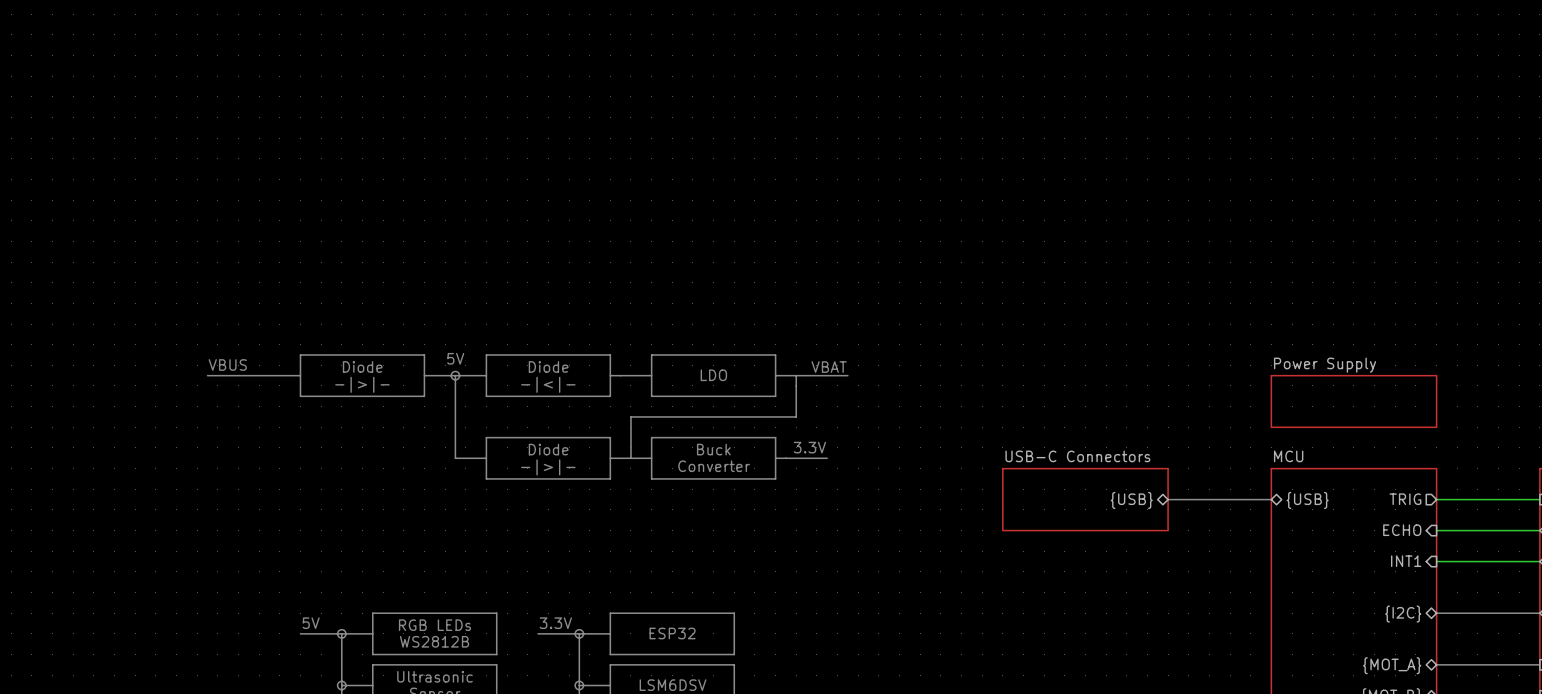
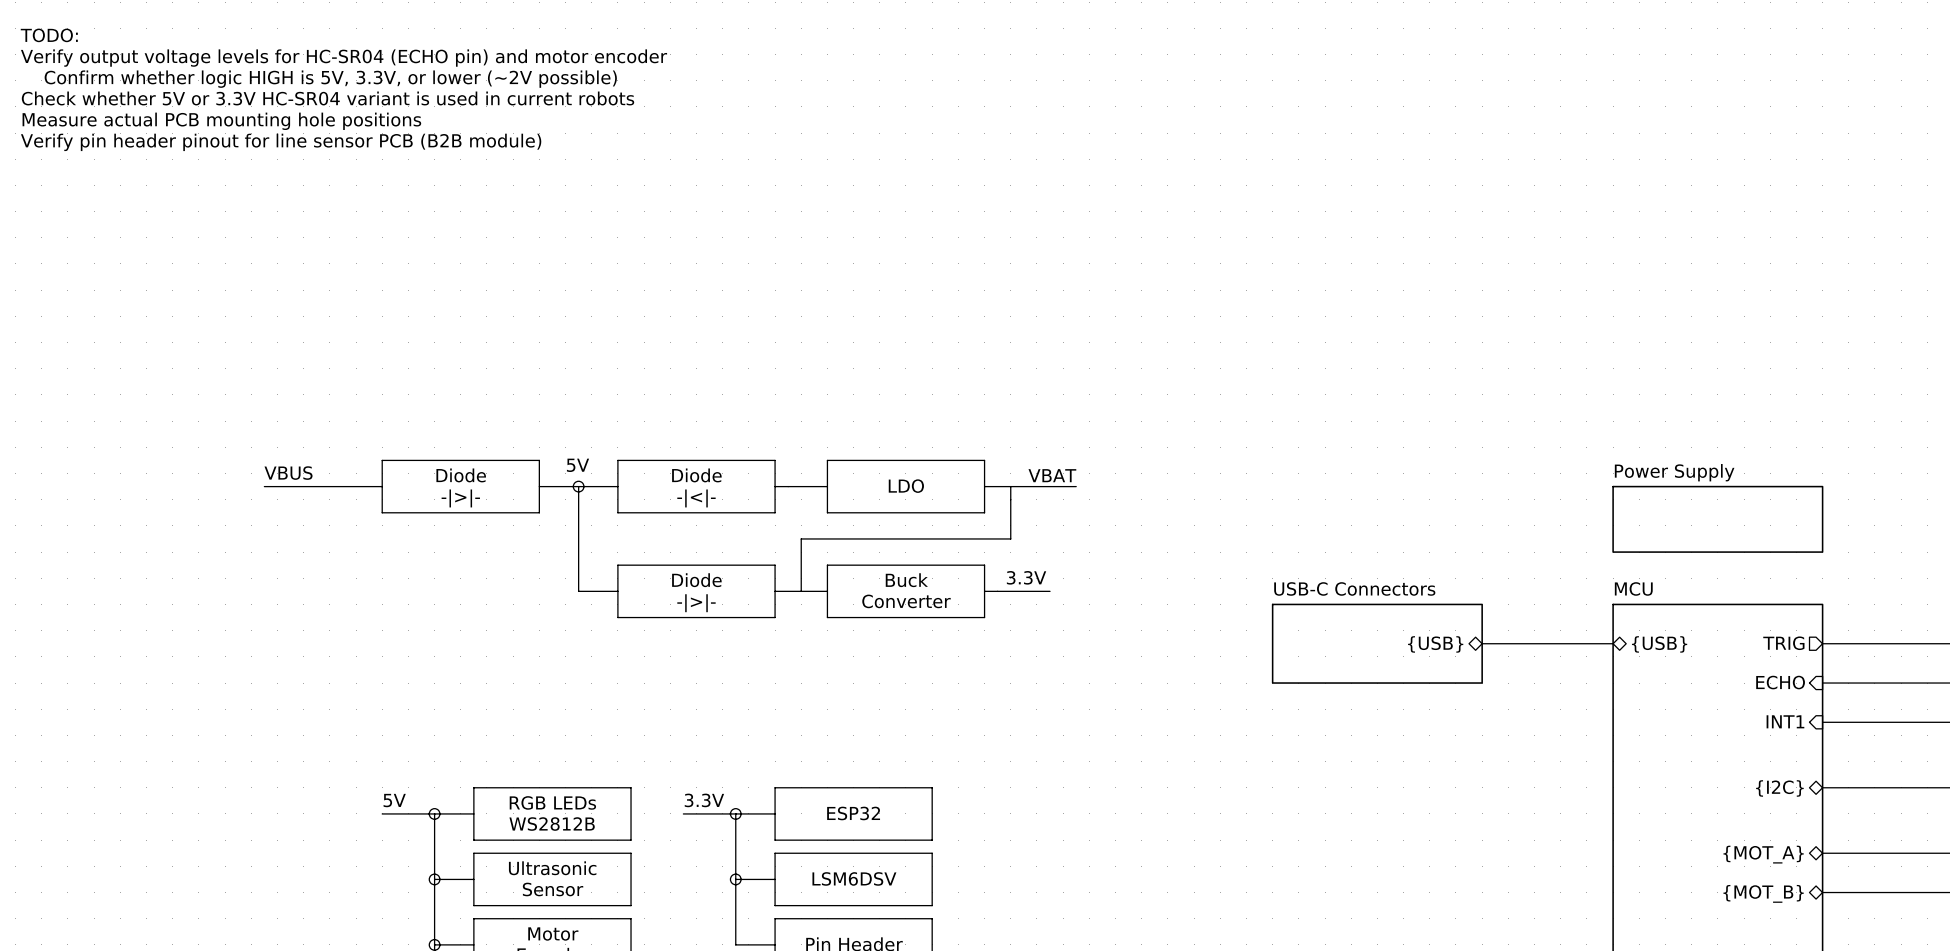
text: none -> TODO: (49, 35)
text: none -> Verify output voltage levels for HC-SR04 (ECHO pin) and motor encoder (344, 58)
text: none -> Confirm whether logic HIGH is 5V, 3.3V, or lower (~2V possible) (330, 79)
text: none -> Check whether 5V or 3.3V HC-SR04 variant is used in current robots (328, 98)
text: none -> Measure actual PCB mounting hole positions (221, 121)
text: none -> Verify pin header pinout for line sensor PCB (B2B module) (281, 142)

